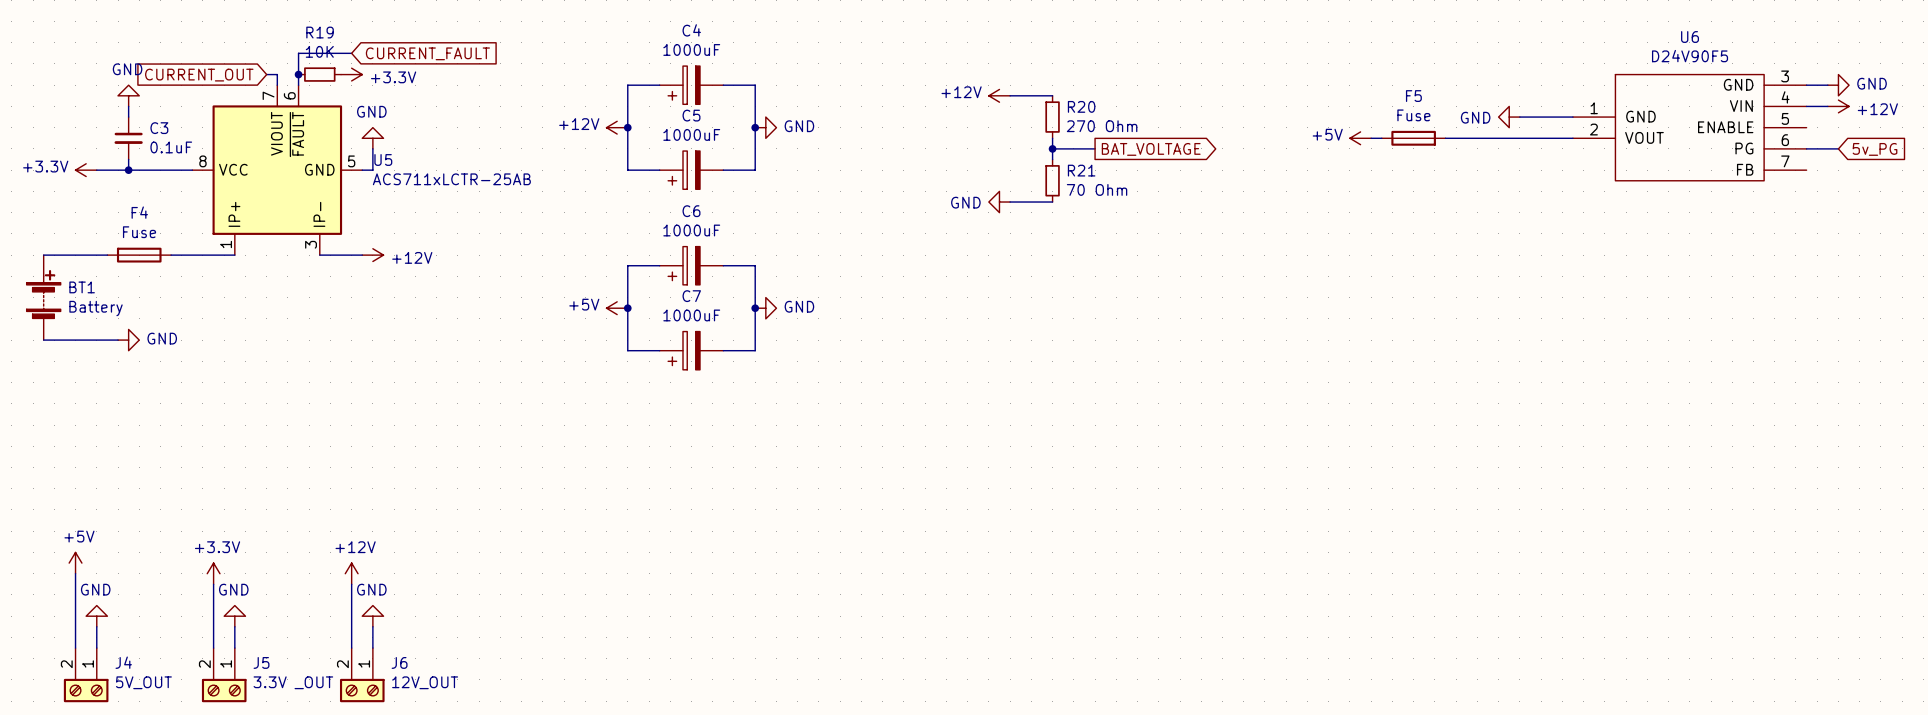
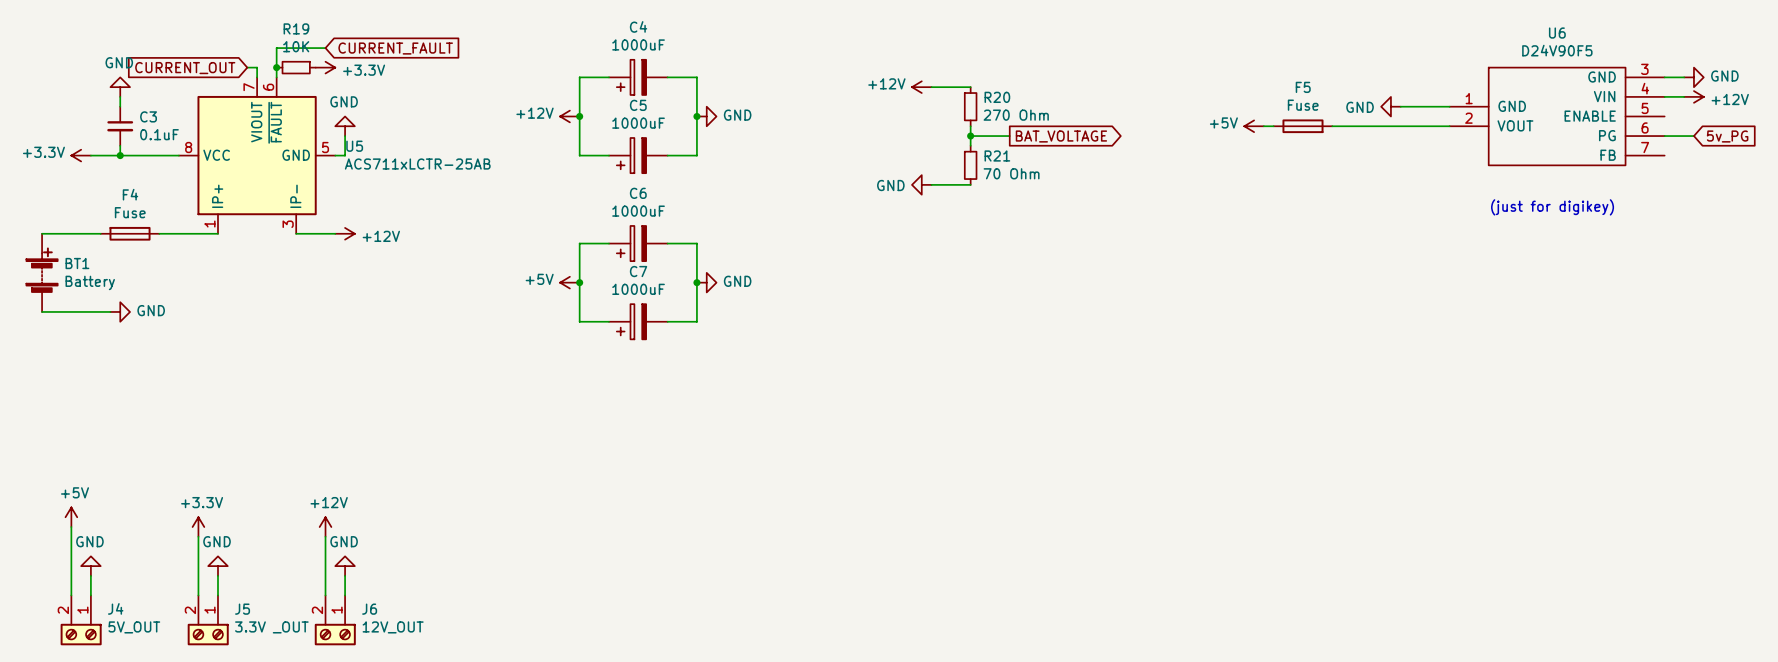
text: none -> (just for digikey) (1552, 207)

